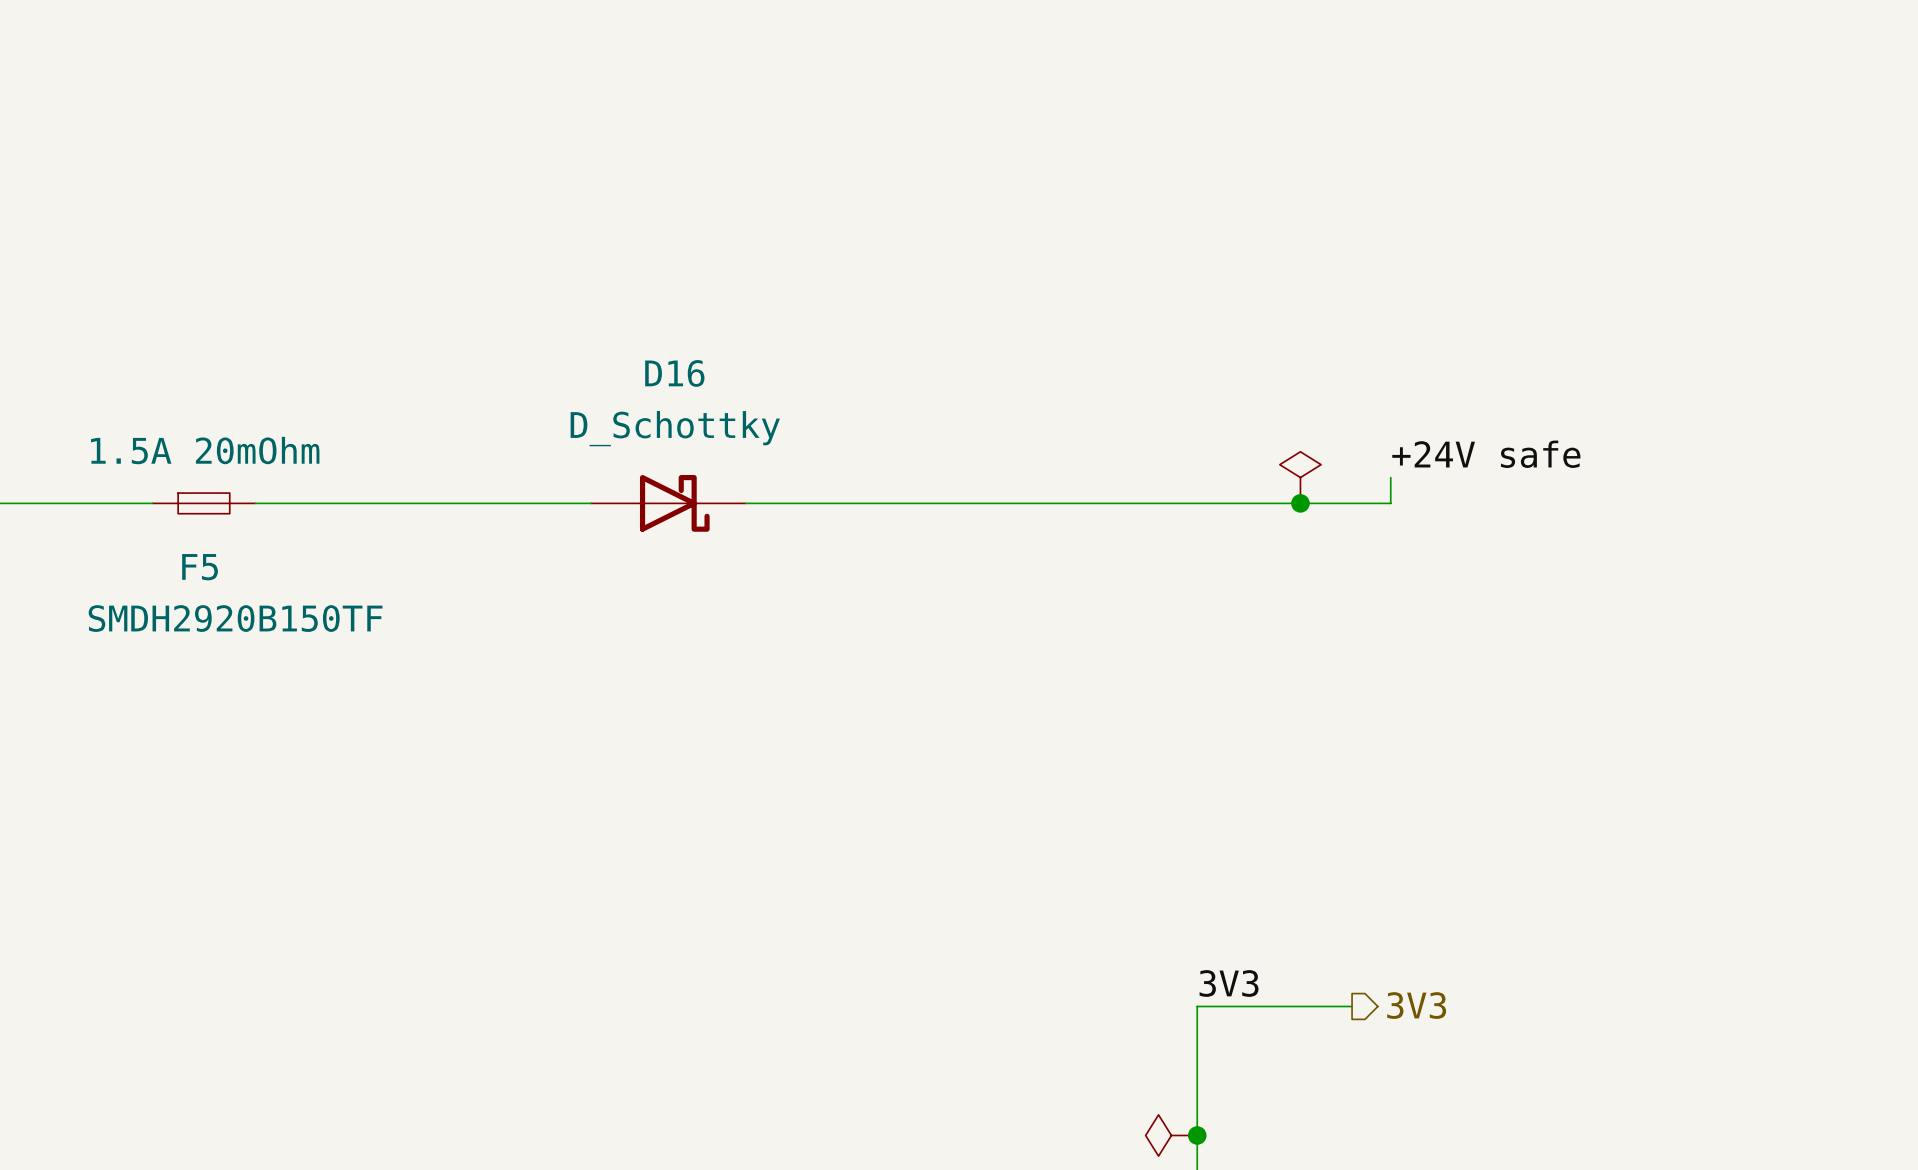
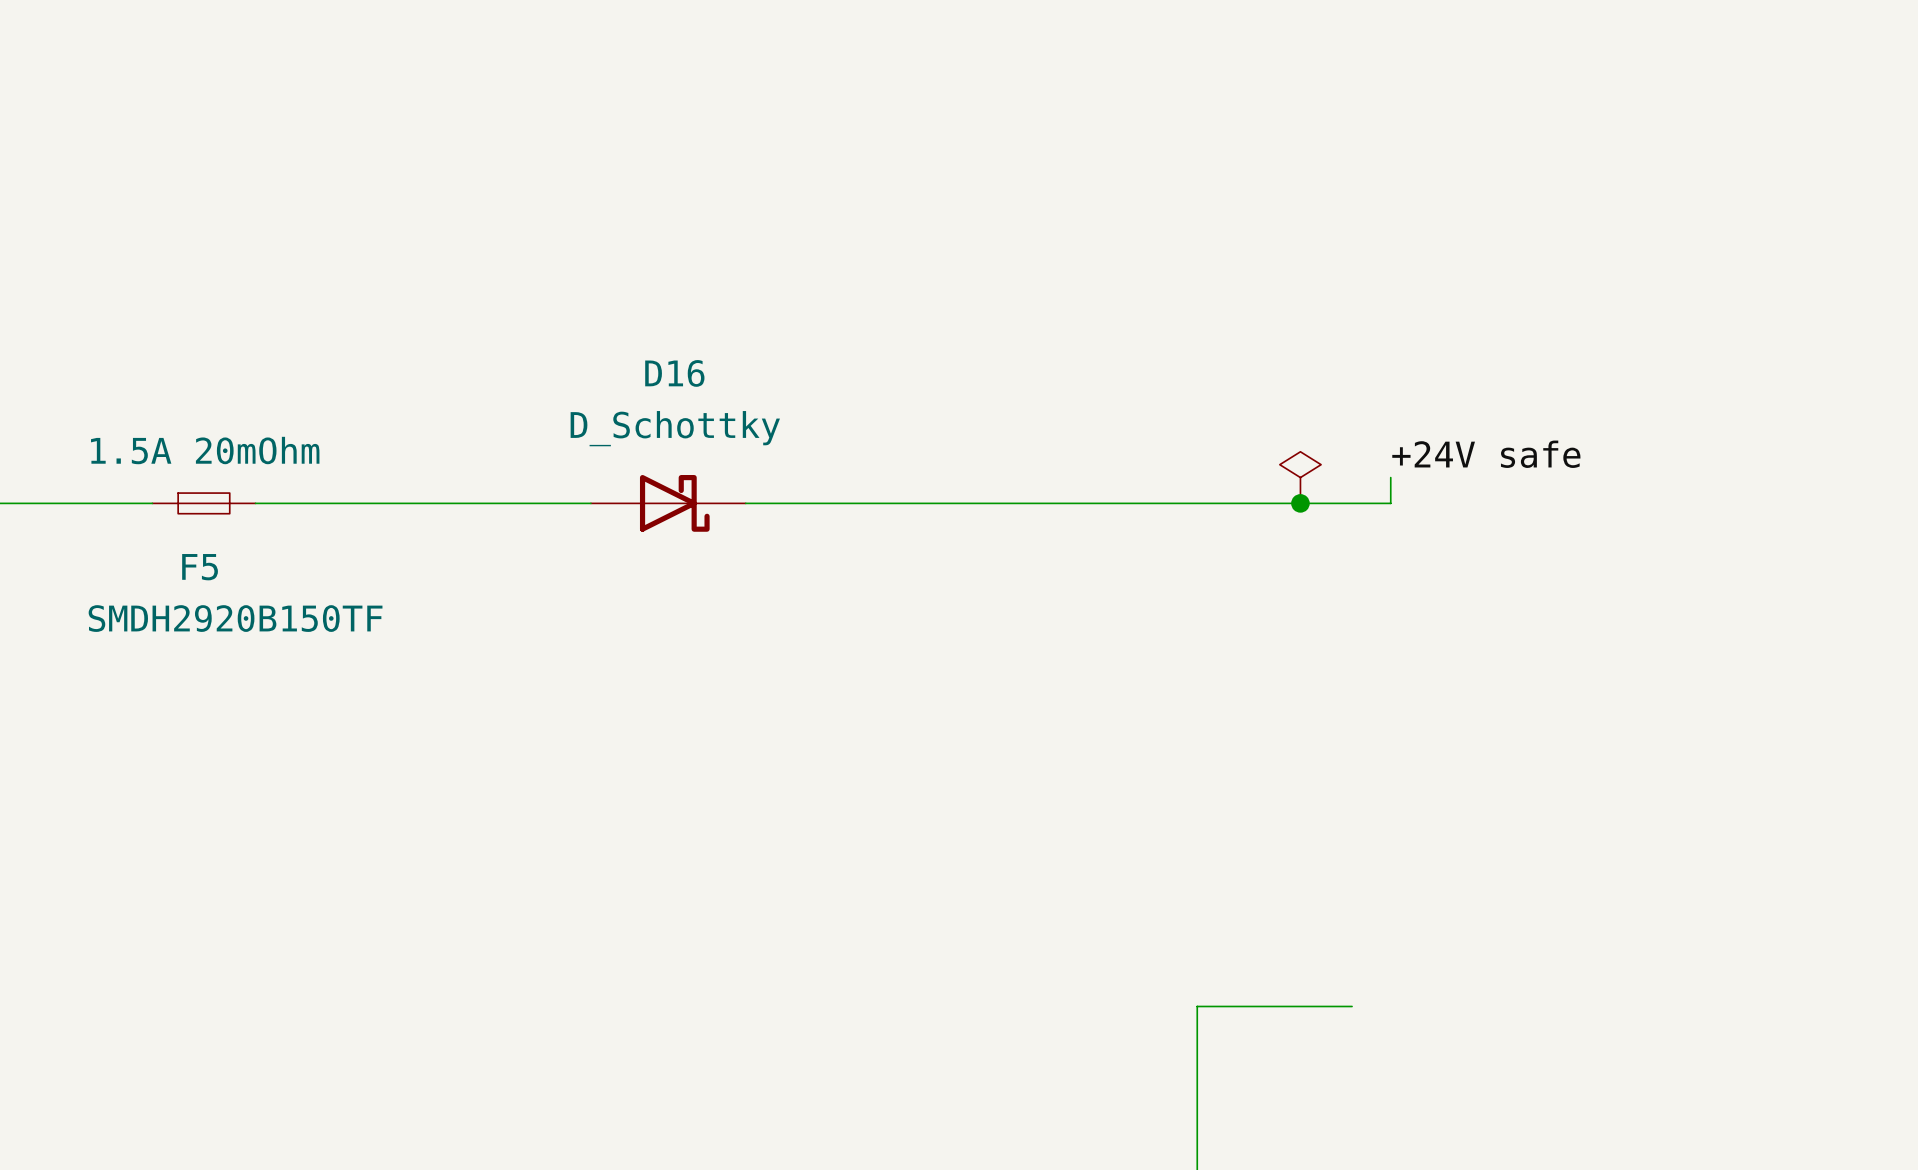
label: 3V3 (1229, 983) -> none
hierarchical label: 3V3 (1416, 1005) -> none
power symbol: (1171, 1135) -> none
junction: (1197, 1135) -> none

